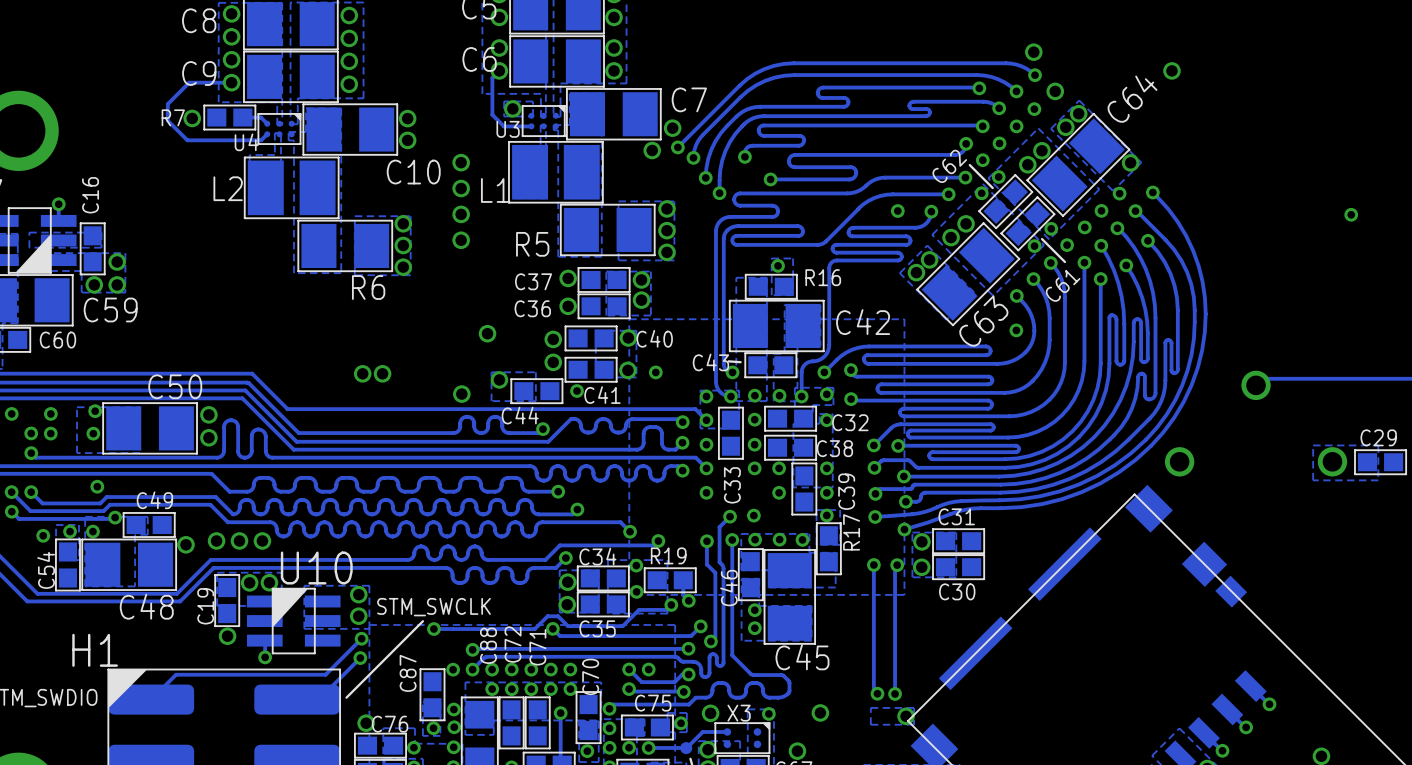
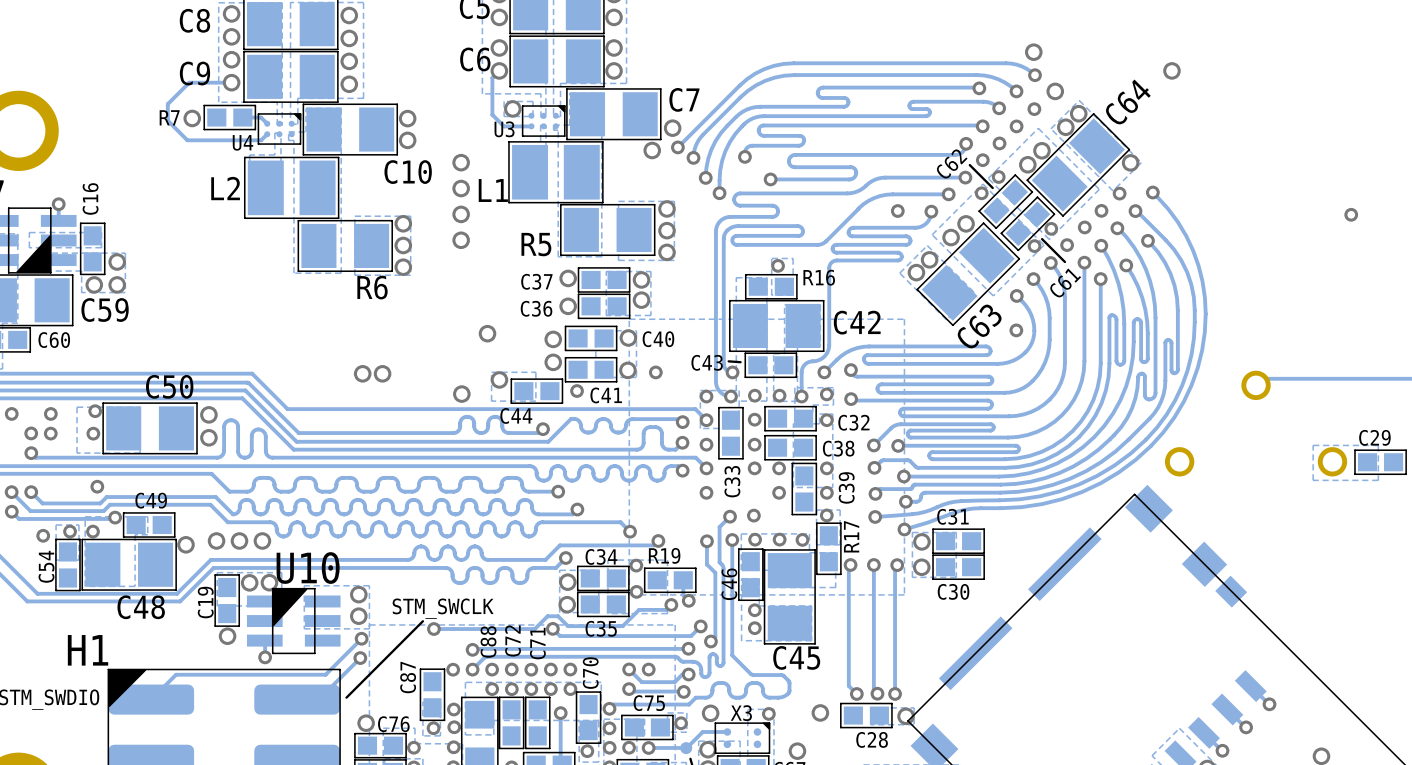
track: none -> (850, 564) (848, 566) (848, 685) (856, 693)
via: none -> (850, 564)
via: none -> (856, 693)
C28: none -> (866, 715)

